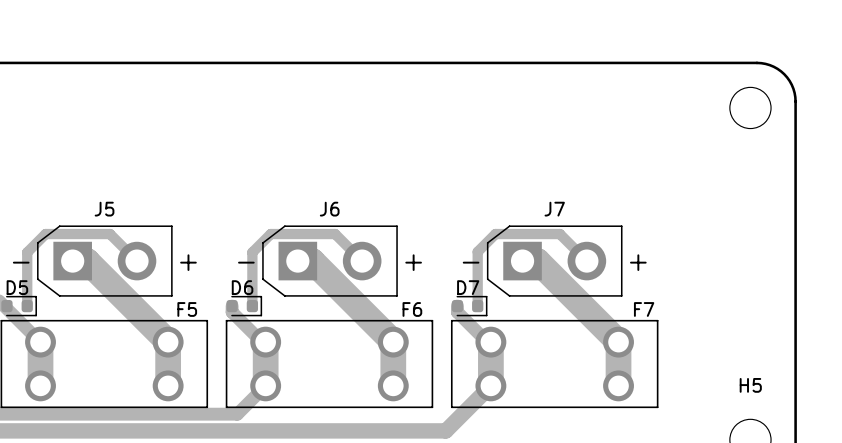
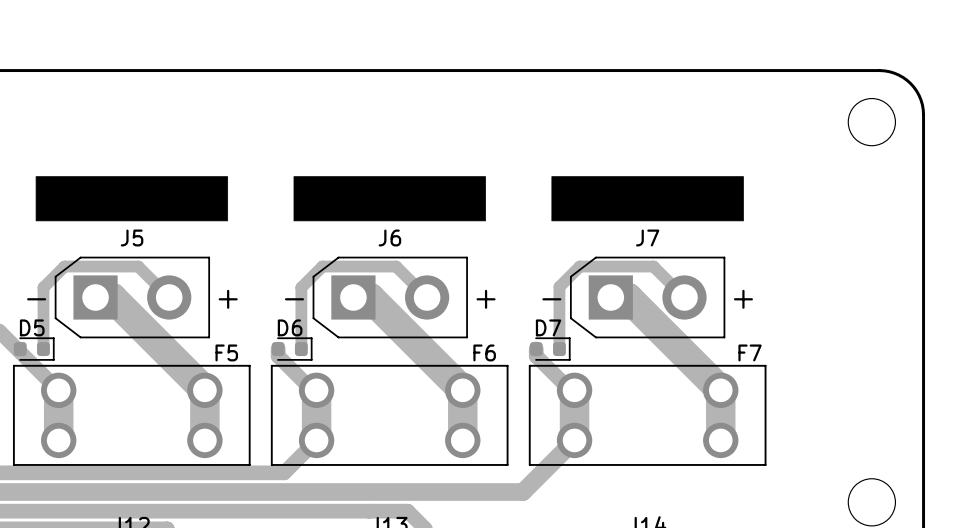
drawing: none -> [35, 176, 229, 222]
drawing: none -> [293, 176, 486, 222]
drawing: none -> [551, 176, 744, 222]
H5 name: H5 (750, 385) -> none

